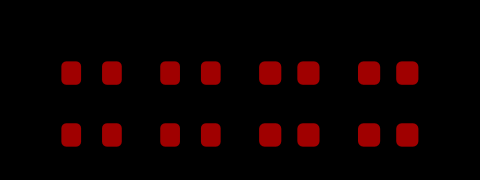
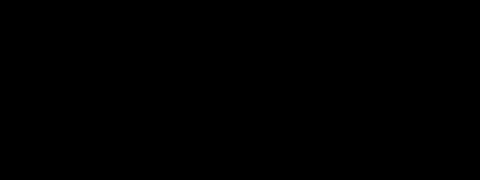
part: (91, 73) -> none
part: (190, 73) -> none
part: (289, 73) -> none
part: (388, 73) -> none
part: (91, 134) -> none
part: (190, 134) -> none
part: (289, 134) -> none
part: (388, 134) -> none

